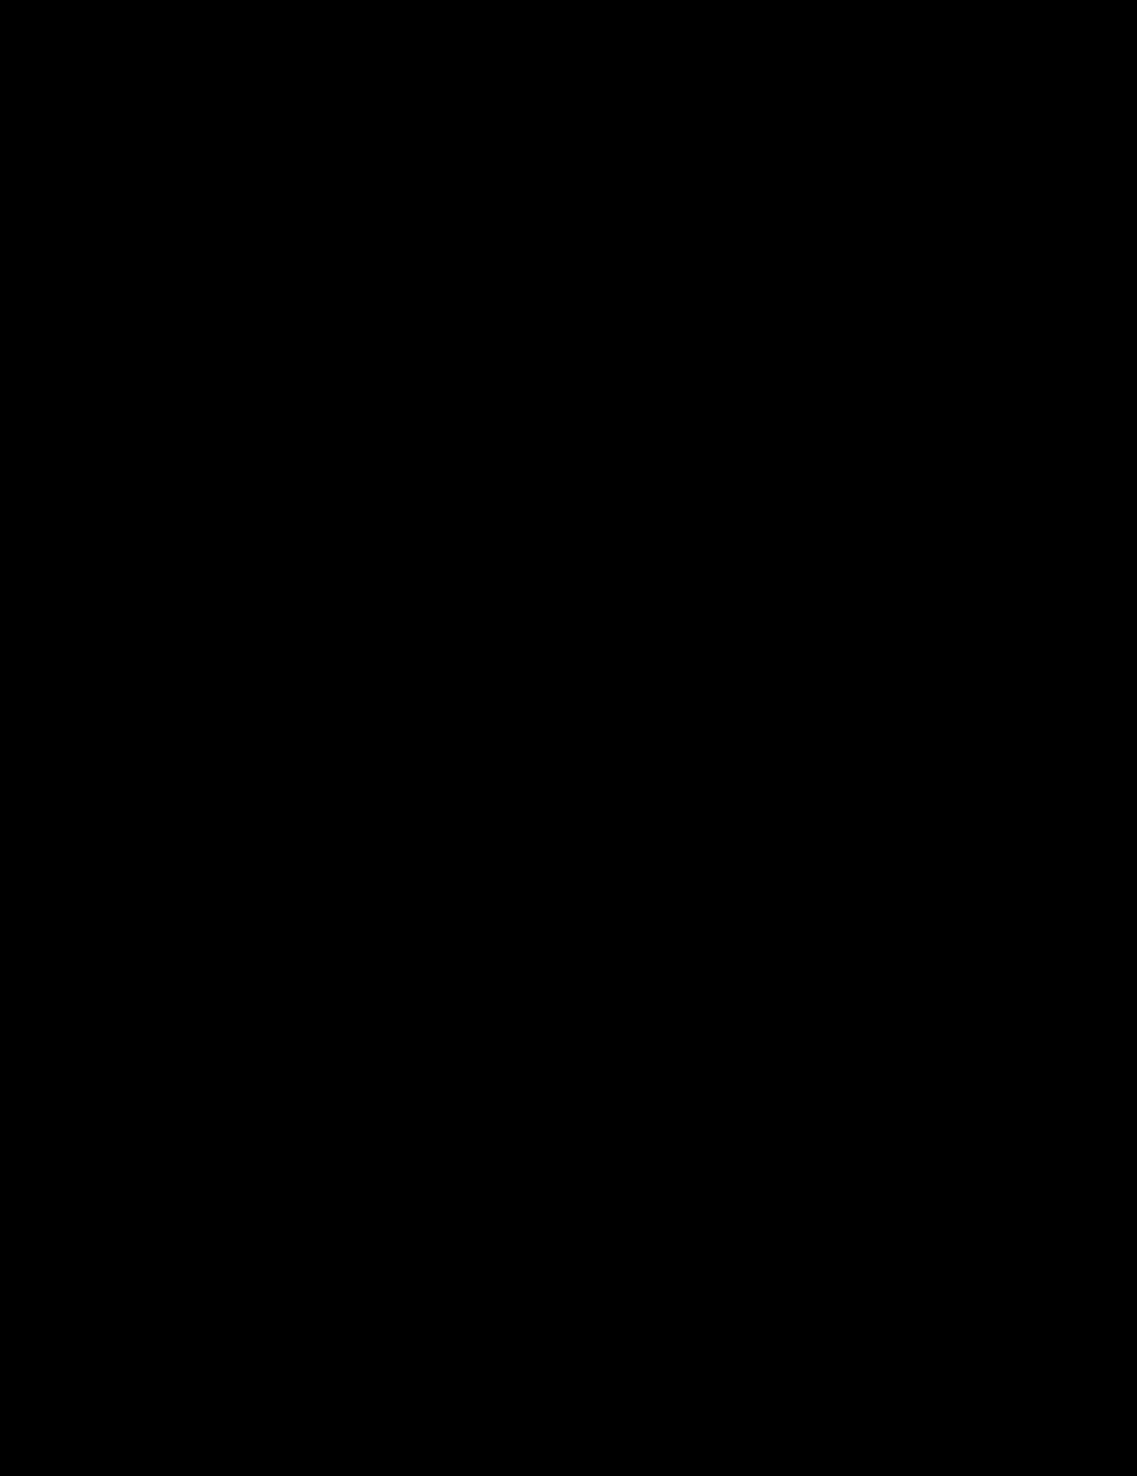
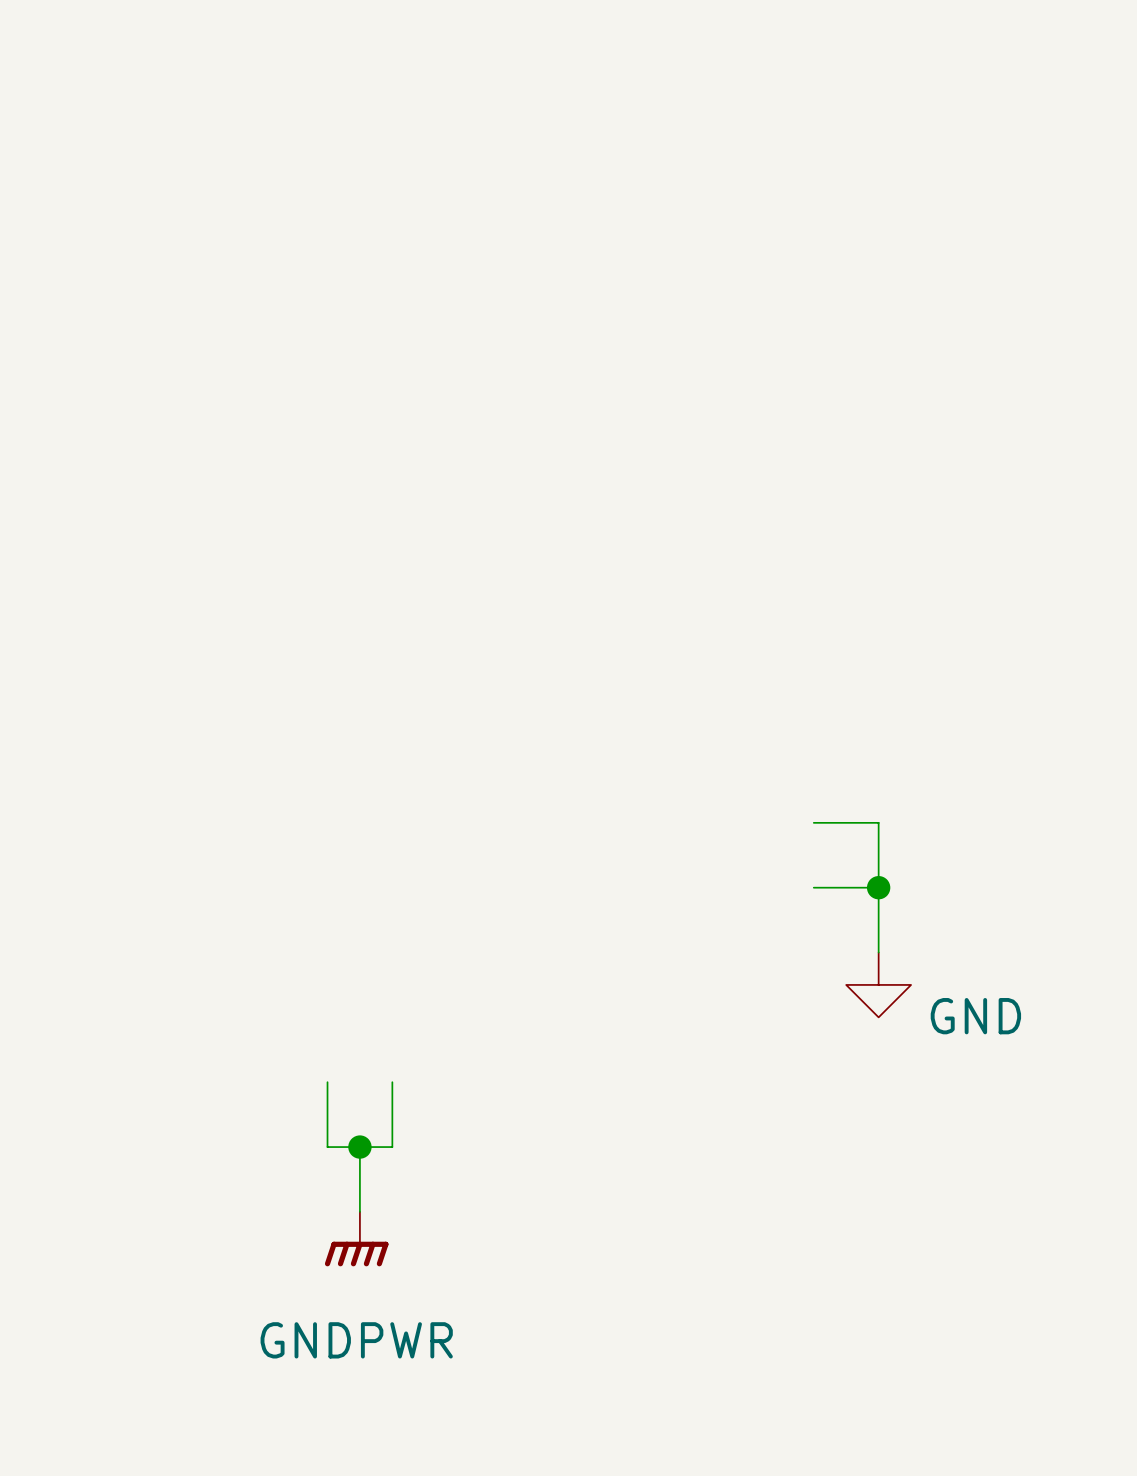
wire: none -> (813, 822) (878, 822) (878, 952)
wire: none -> (813, 887) (878, 887)
junction: none -> (878, 887)
power symbol: none -> GND (878, 984)
wire: none -> (327, 1082) (327, 1147) (392, 1147) (392, 1082)
wire: none -> (359, 1147) (359, 1211)
junction: none -> (359, 1147)
power symbol: none -> GNDPWR (356, 1239)

